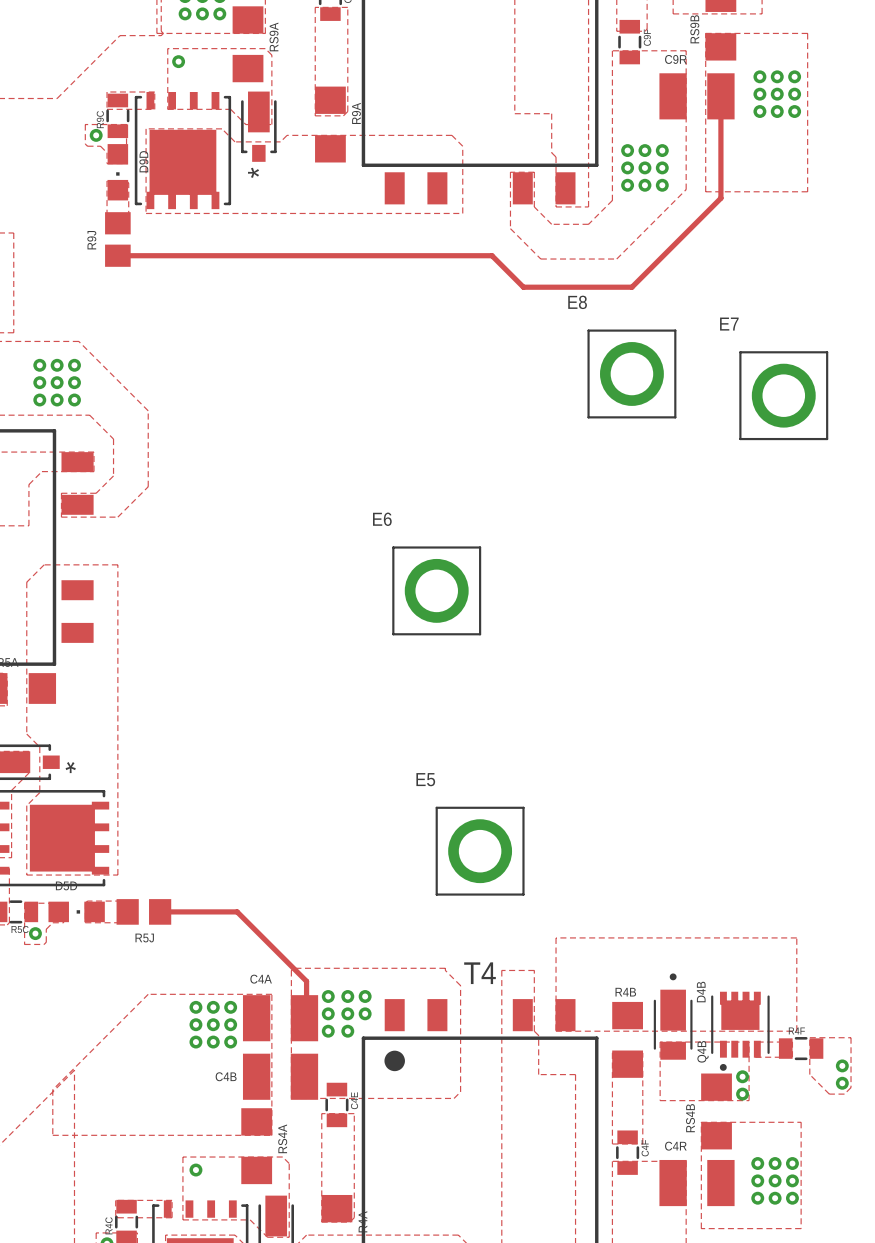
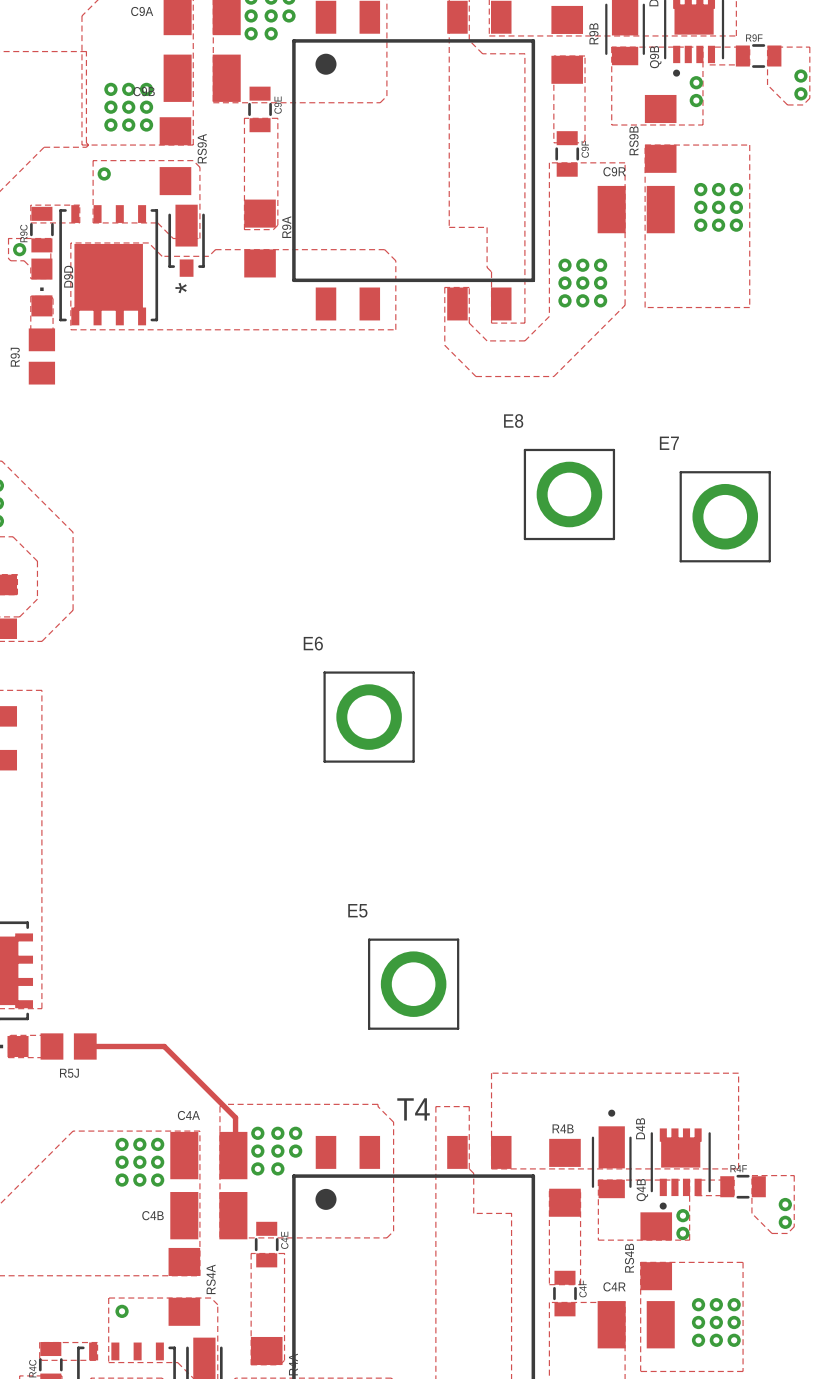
track: (720, 96) (720, 198) (631, 287) (523, 287) (491, 255) (117, 255) -> none

